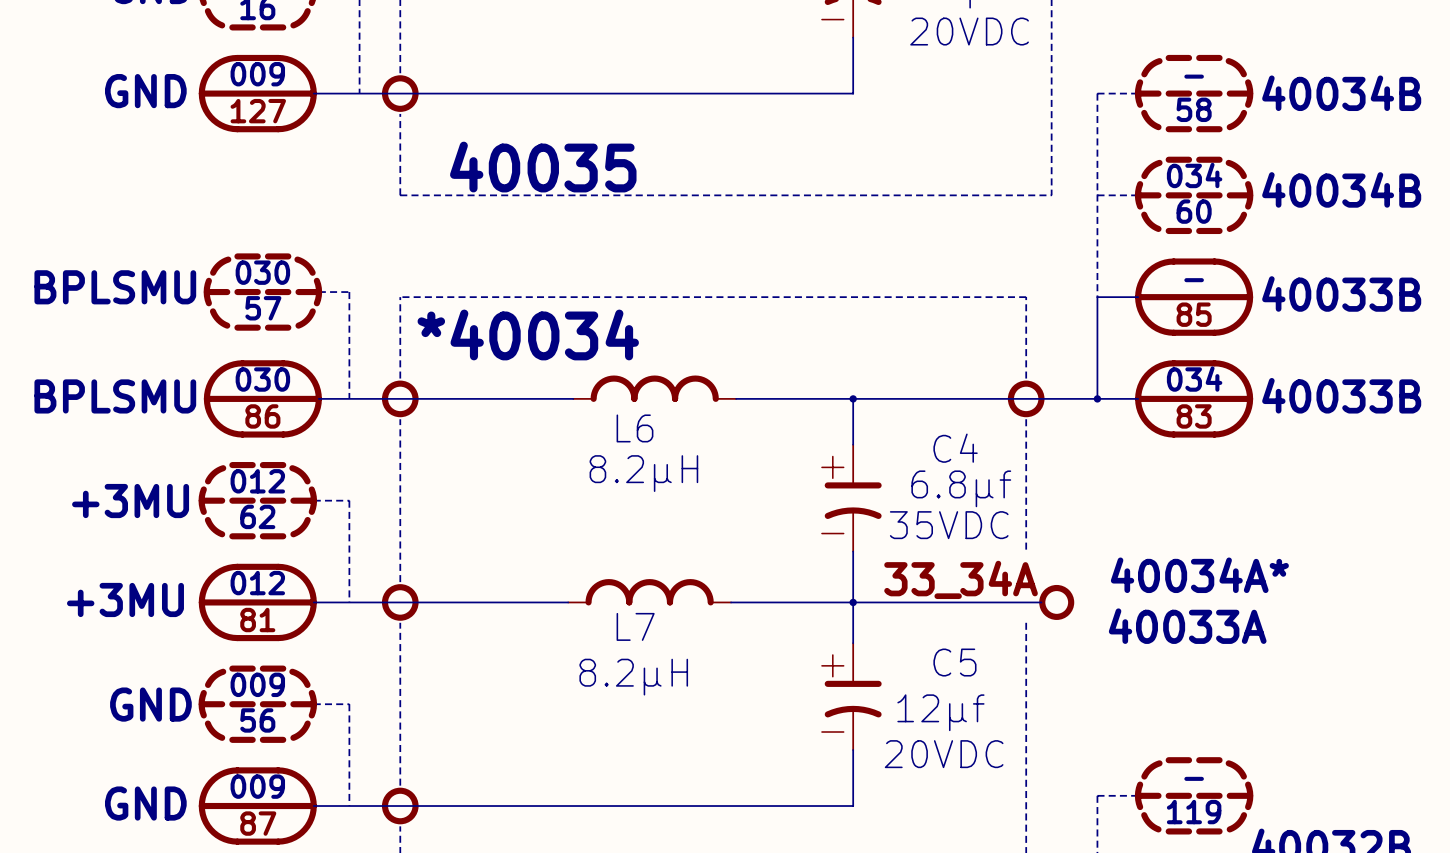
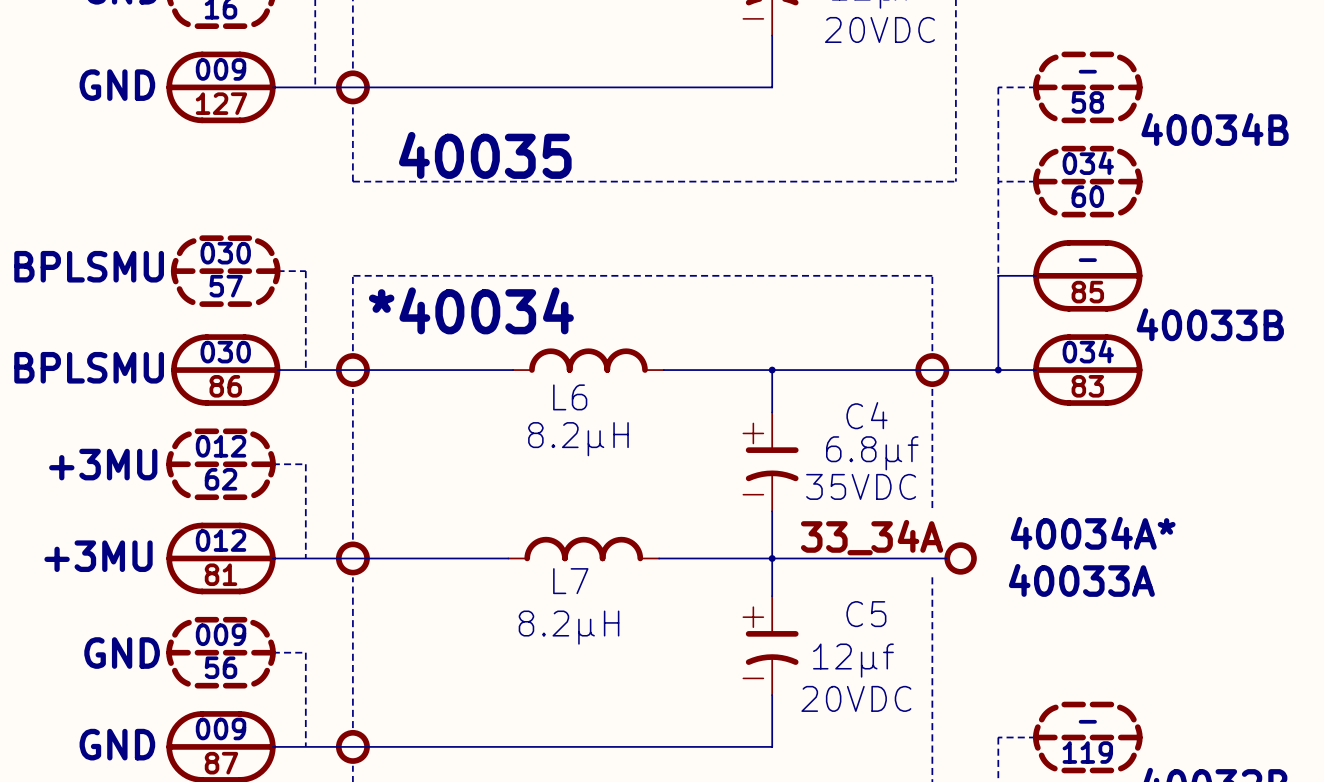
part text: 40034B (1341, 93) -> none
part text position: 40034B (1341, 189) -> 40034B (1215, 129)
part text: 40033B (1341, 293) -> none
part text position: 40033B (1341, 395) -> 40033B (1210, 324)

